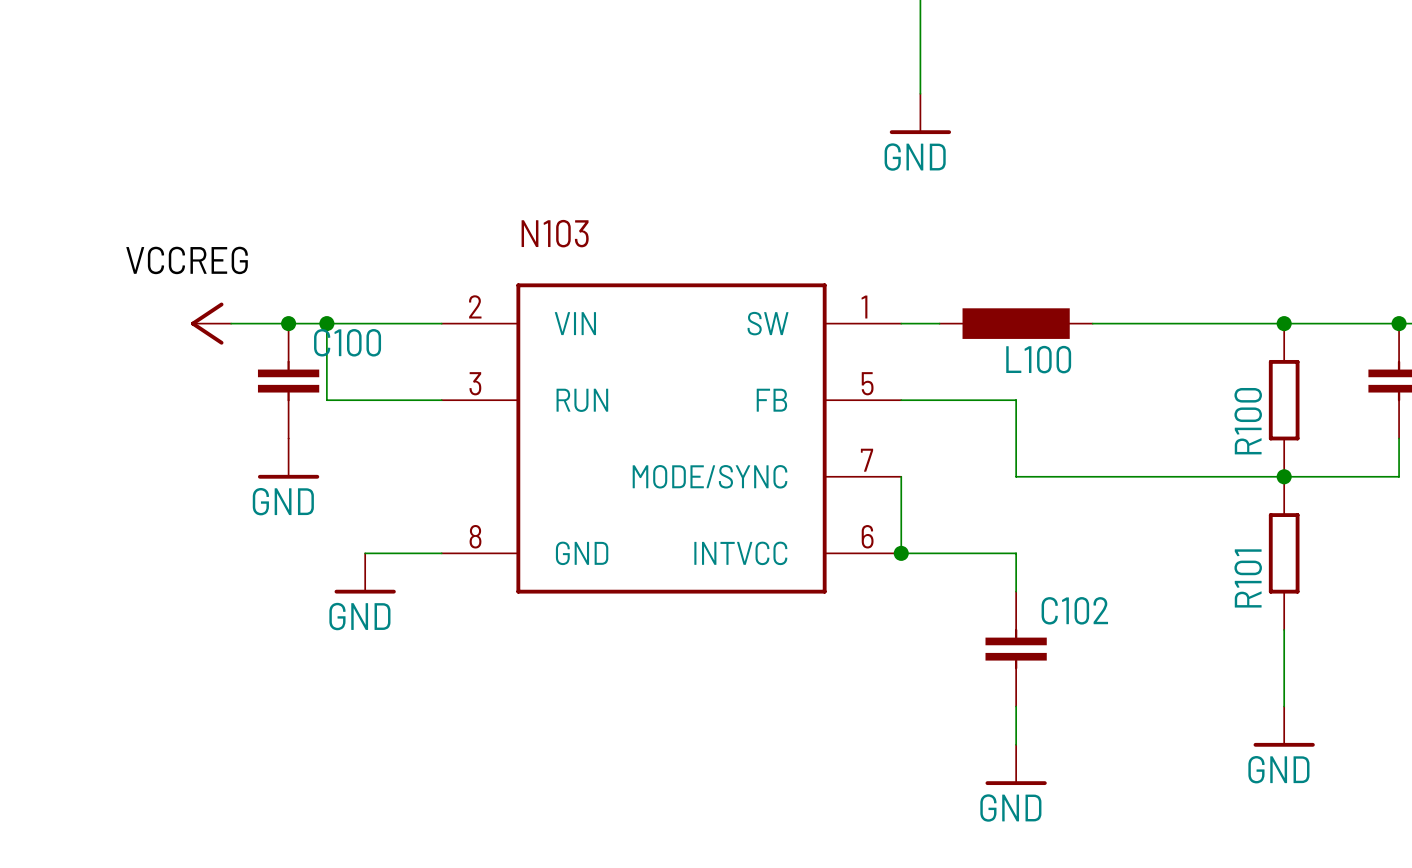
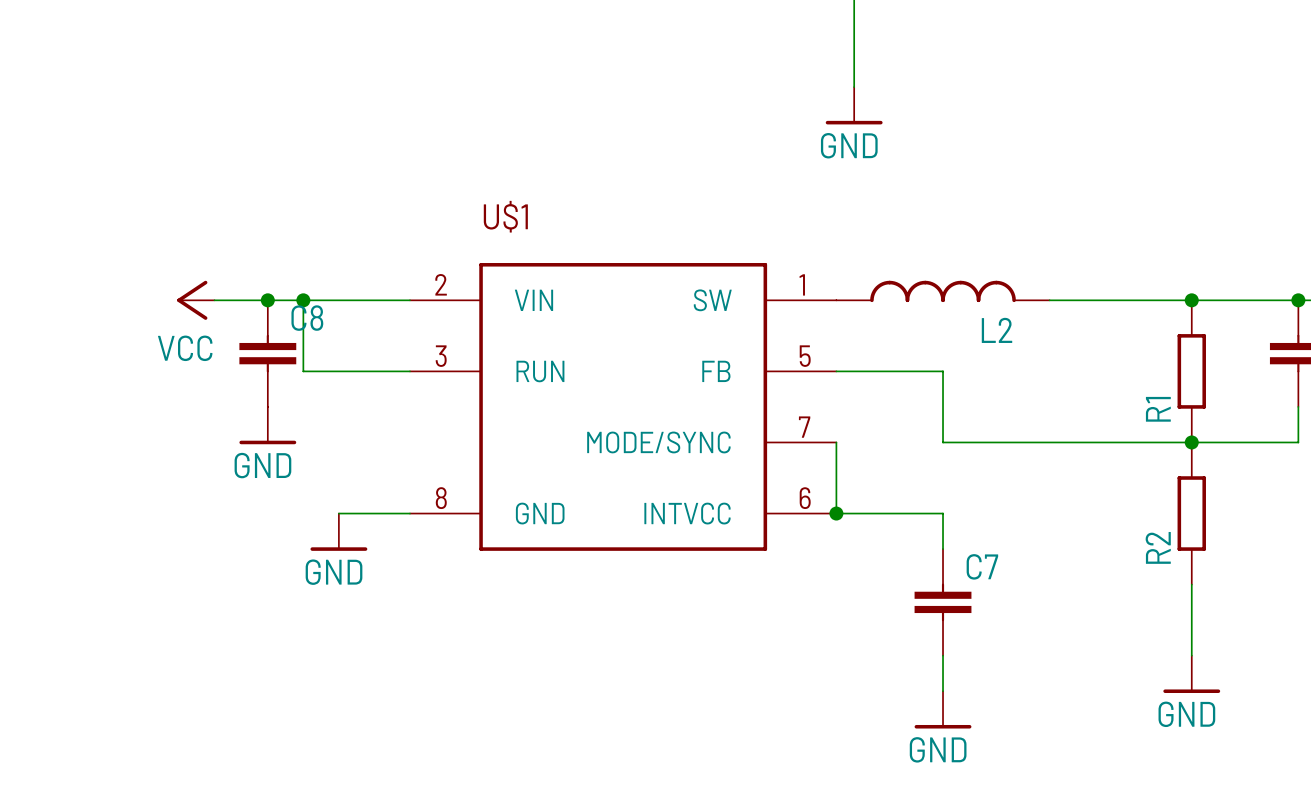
N103 name: N103 (555, 233) -> U$1 (505, 216)
label: VCCREG (187, 260) -> none
L2: none -> (943, 291)
L100: (1016, 323) -> none
C100 name: C100 (347, 342) -> C8 (307, 318)
power symbol text: none -> VCC (185, 348)
R100 name: R100 (1248, 421) -> R1 (1158, 409)
R101 name: R101 (1248, 578) -> R2 (1158, 547)
C102 name: C102 (1074, 610) -> C7 (982, 566)

